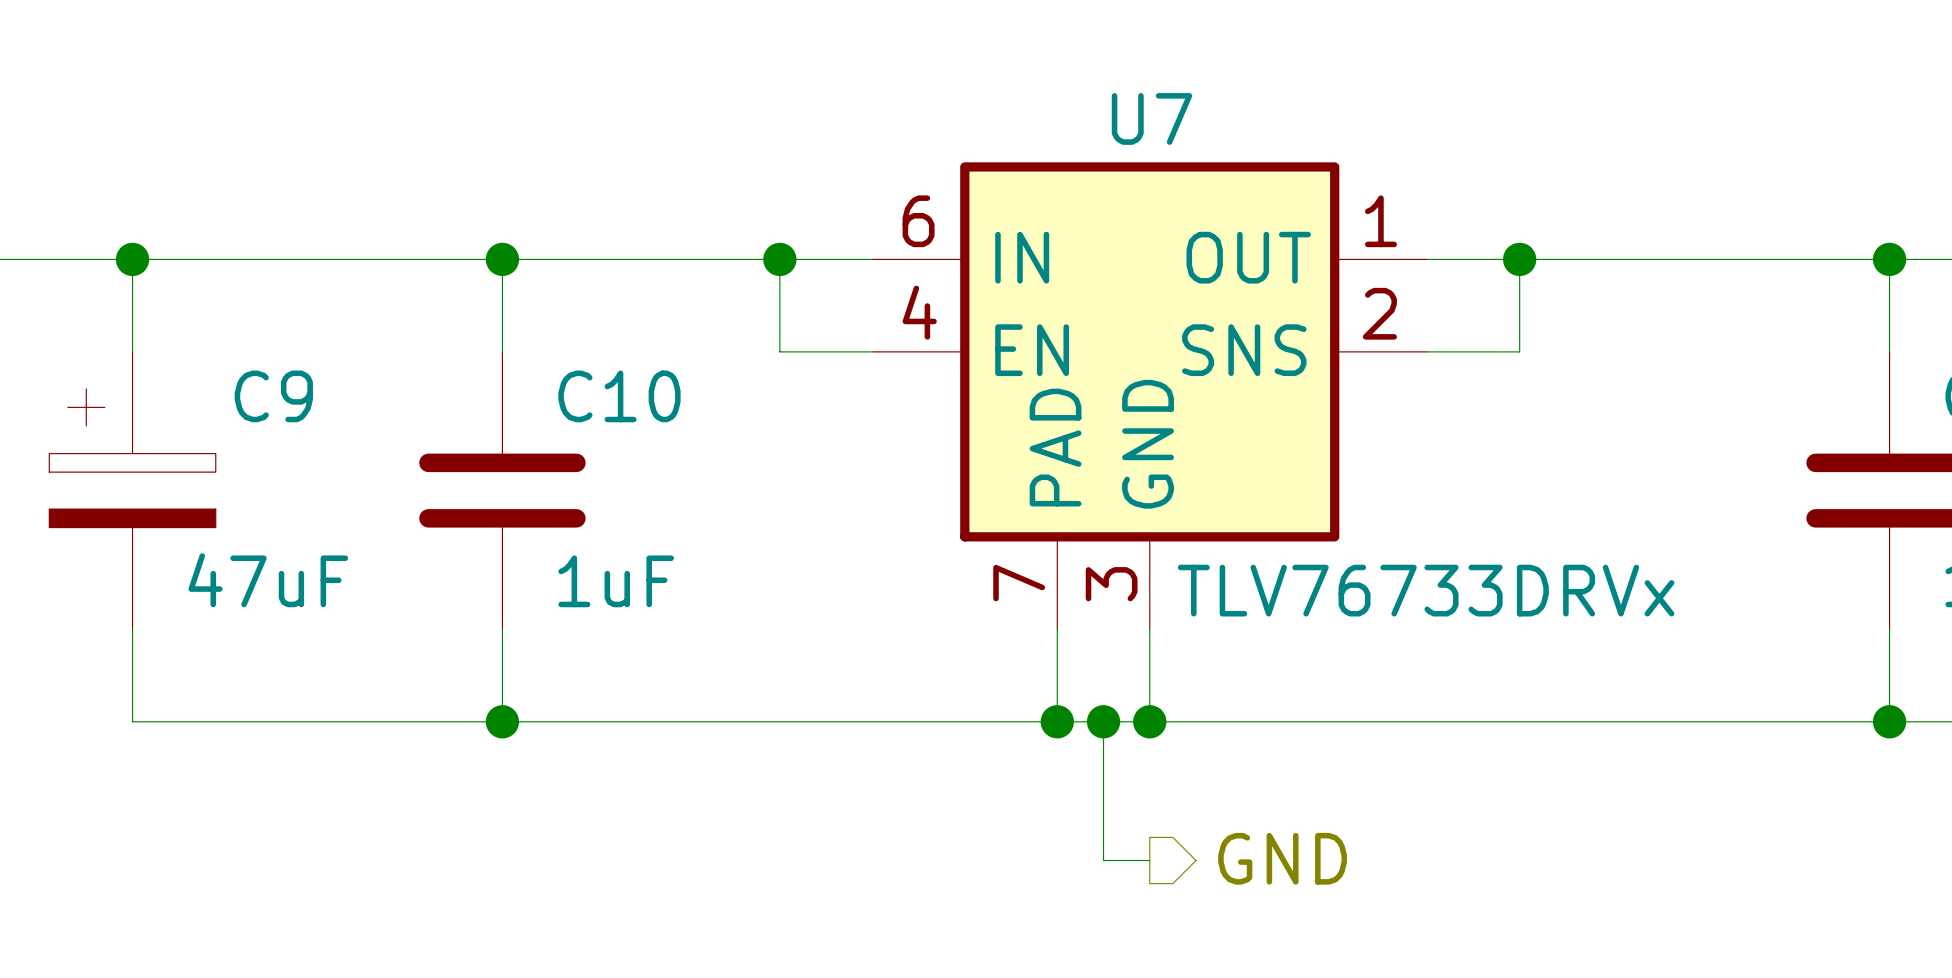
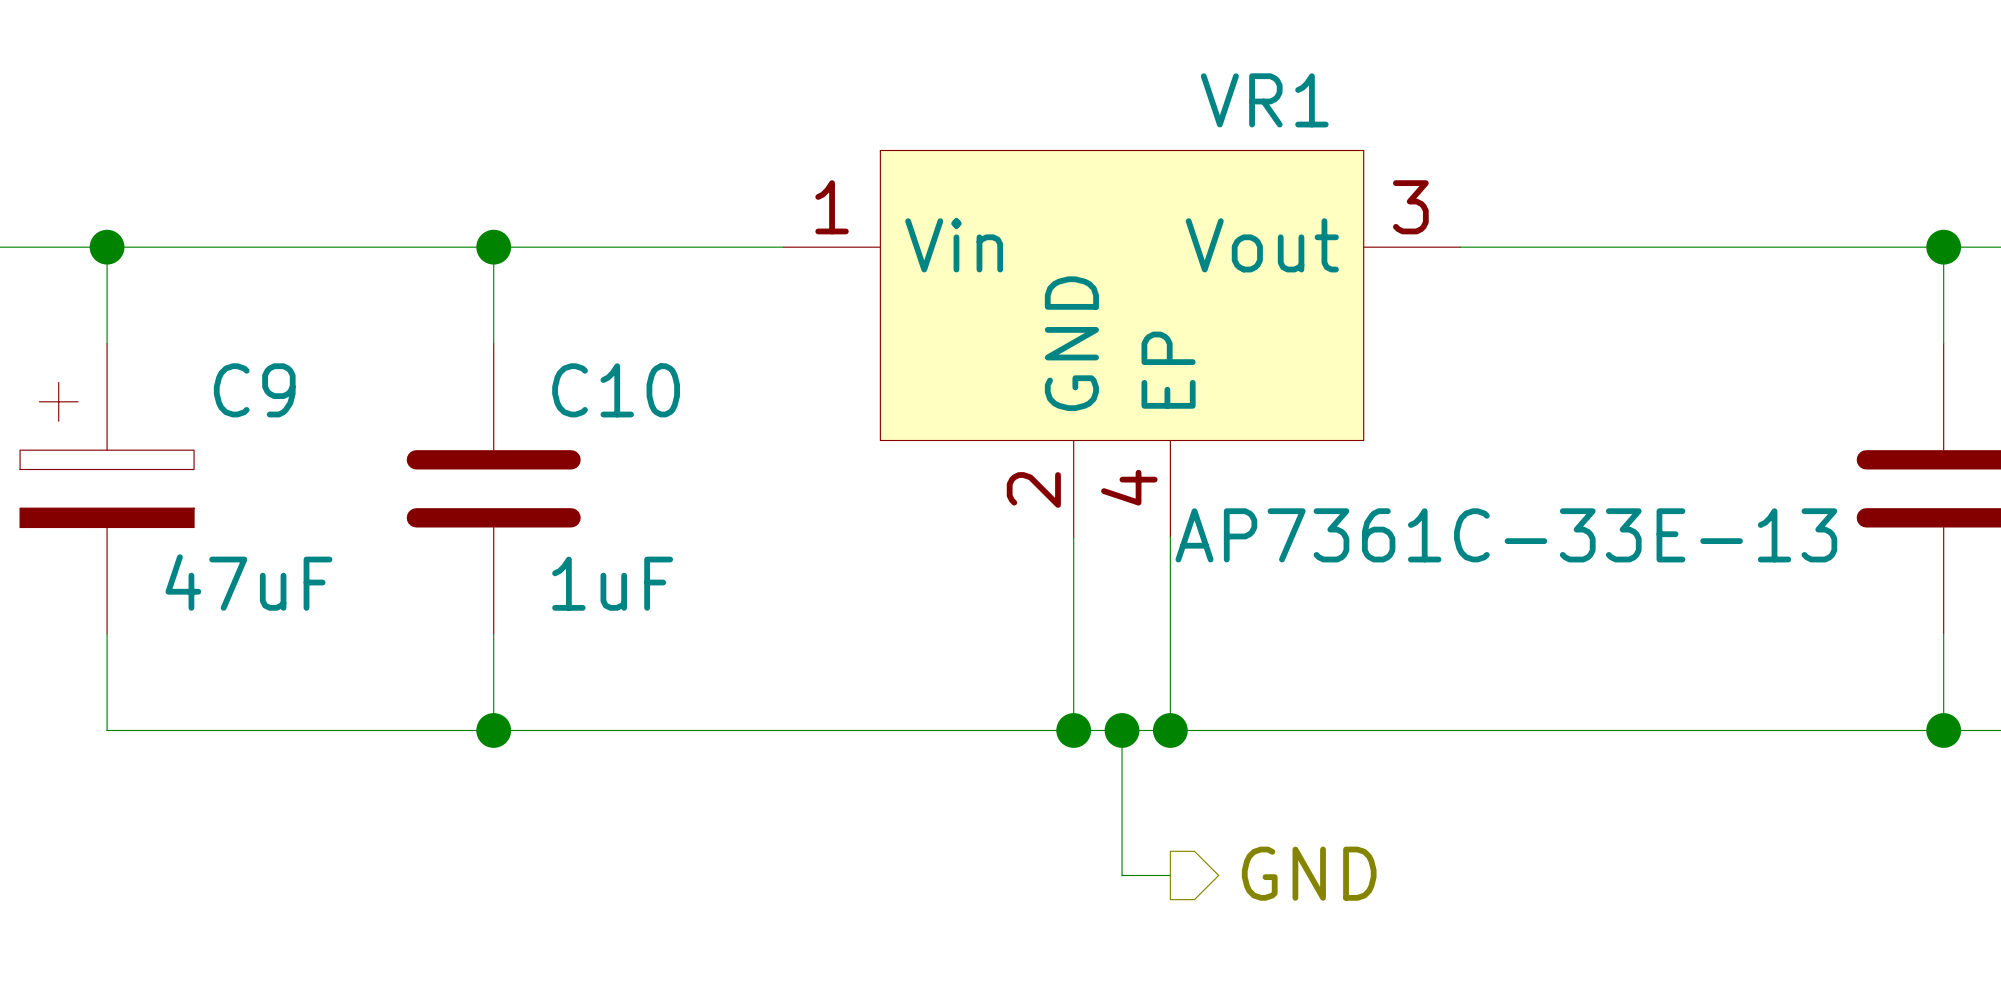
junction: (779, 259) -> none
wire: (872, 259) (779, 259) (779, 351) (872, 351) -> none
wire: (1519, 259) (1519, 351) (1427, 351) -> none
junction: (1519, 259) -> none
VR1: none -> AP7361C-33E-13 (1122, 343)
U7: TLV76733DRVx (1149, 395) -> none

